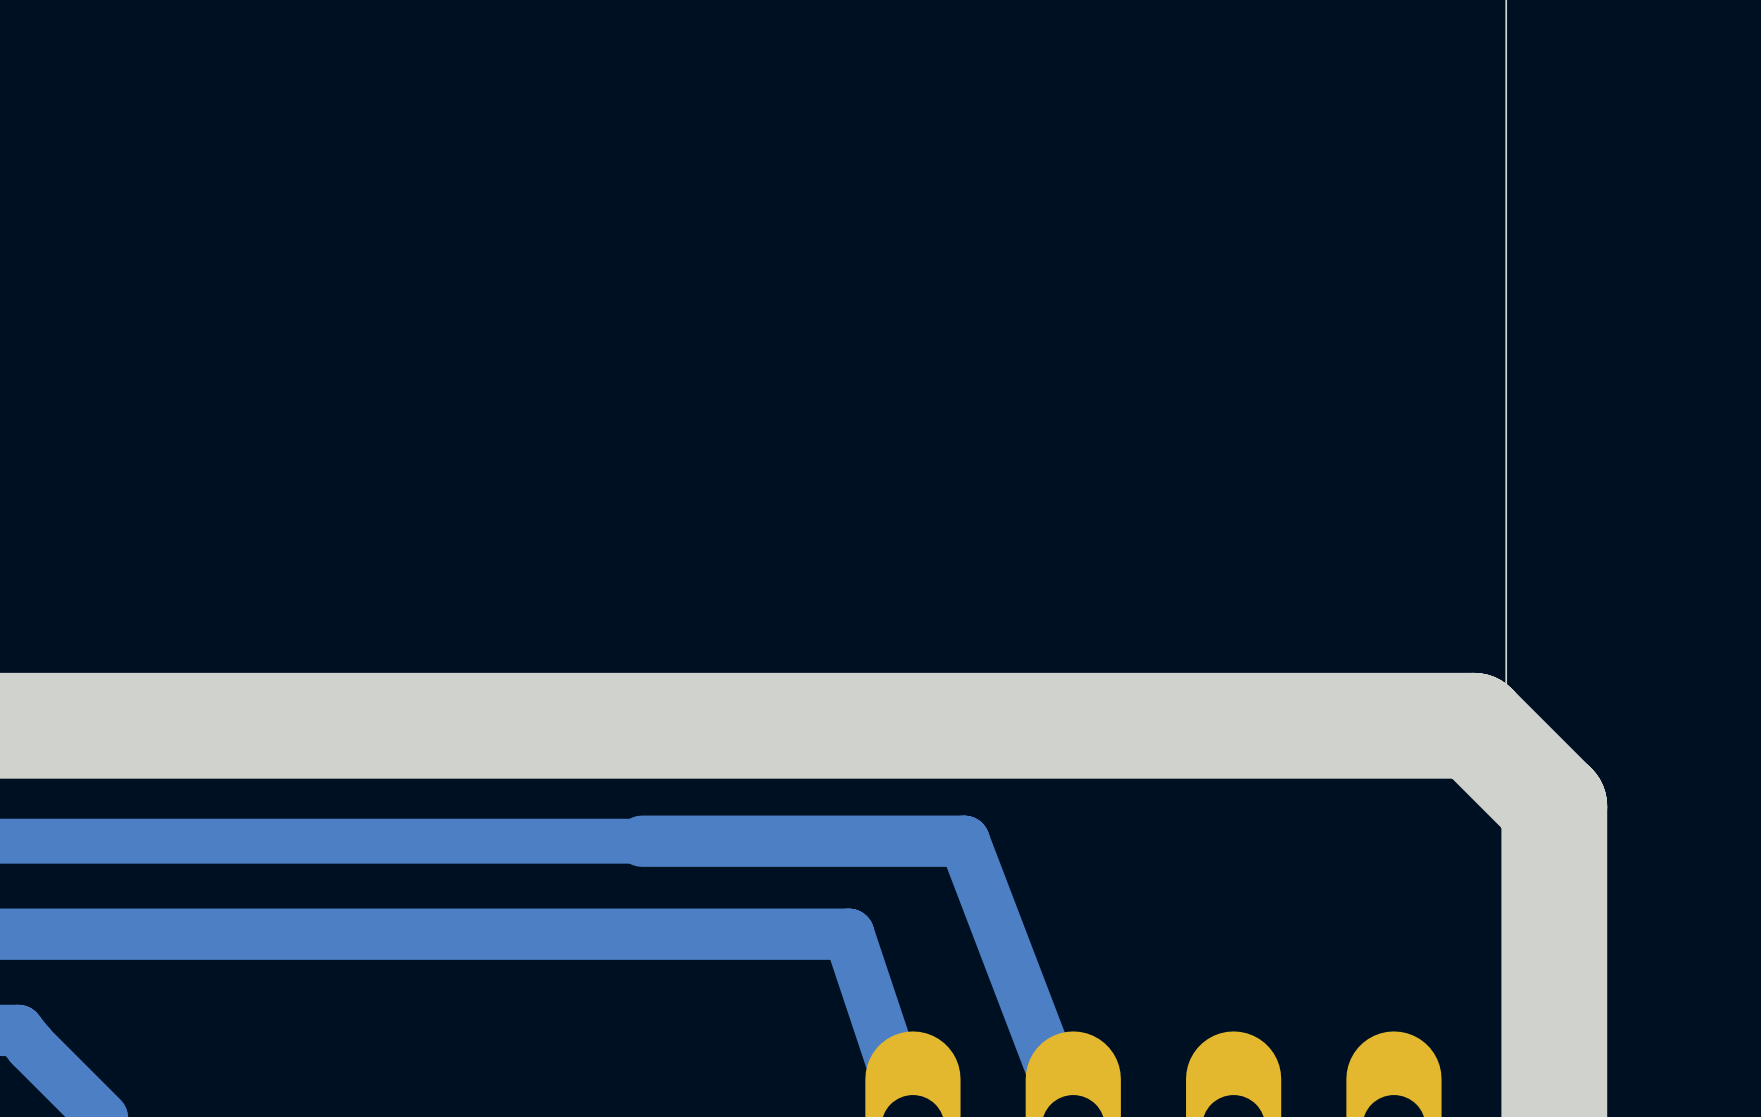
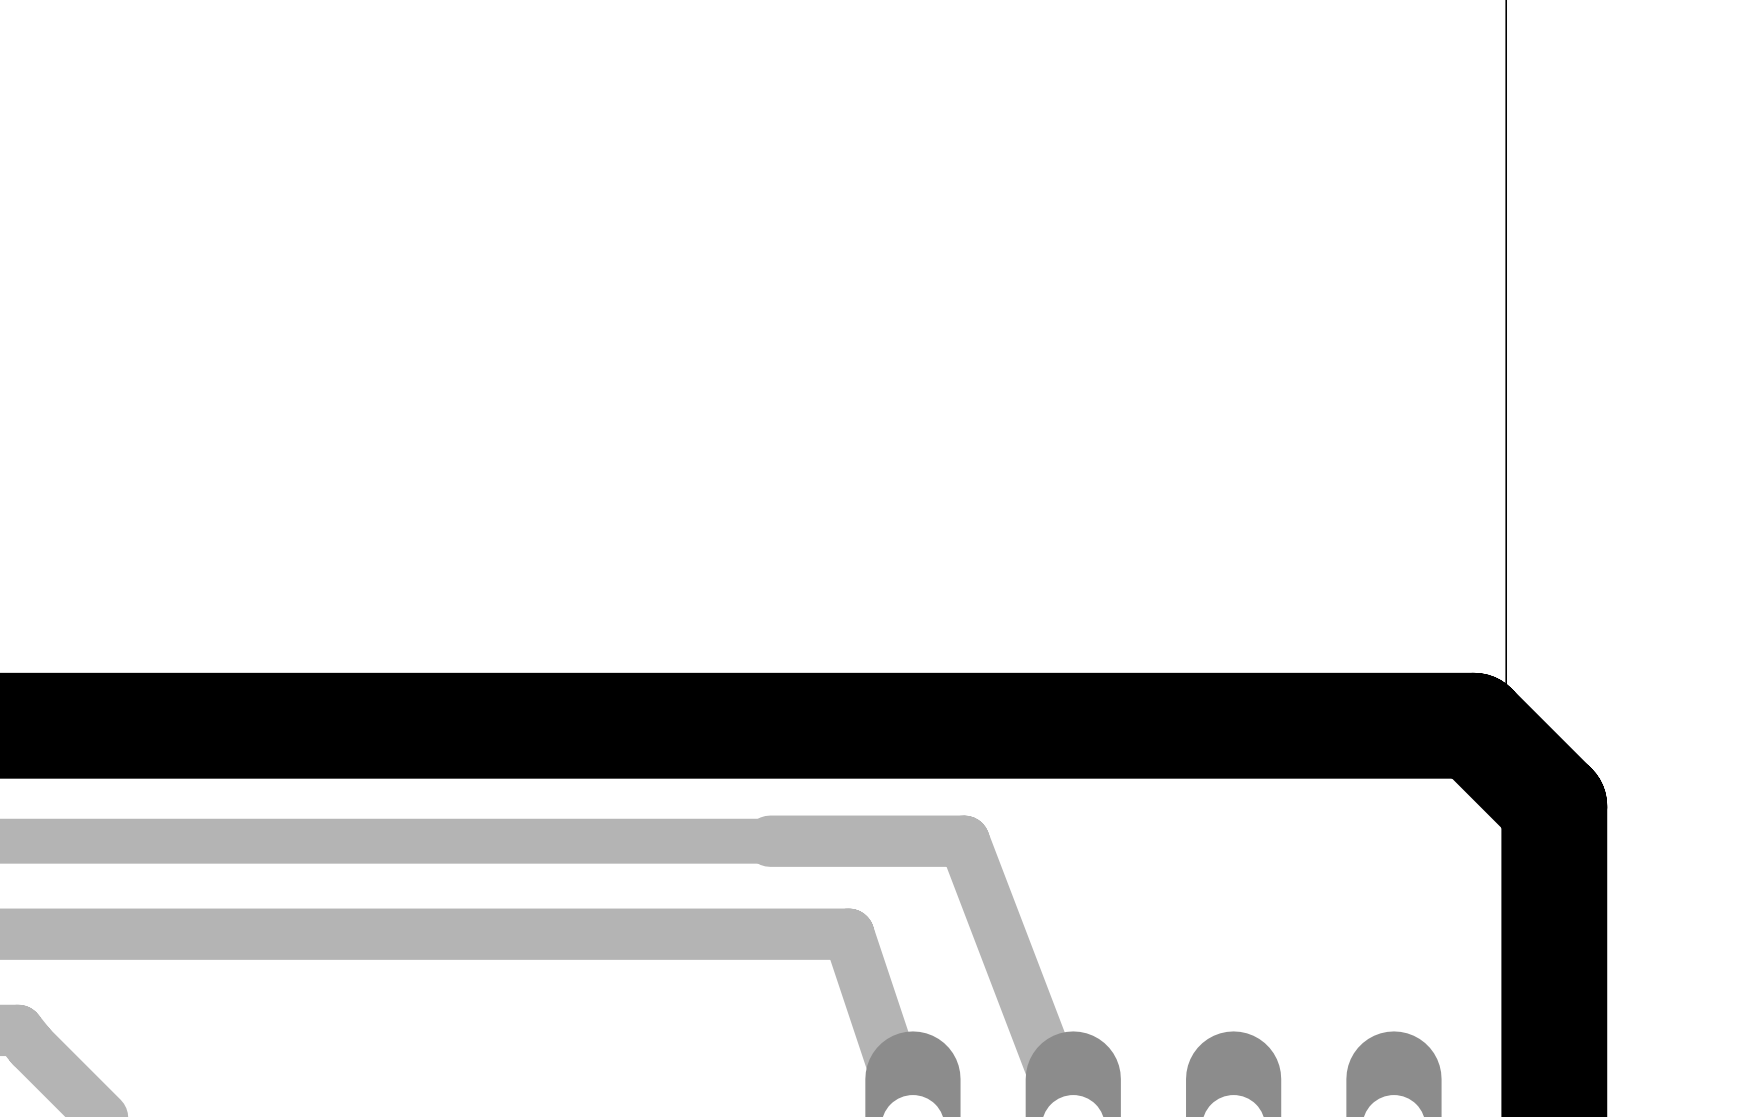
track width: thick (770, 841) (641, 841) -> thin (770, 841) (641, 841)

